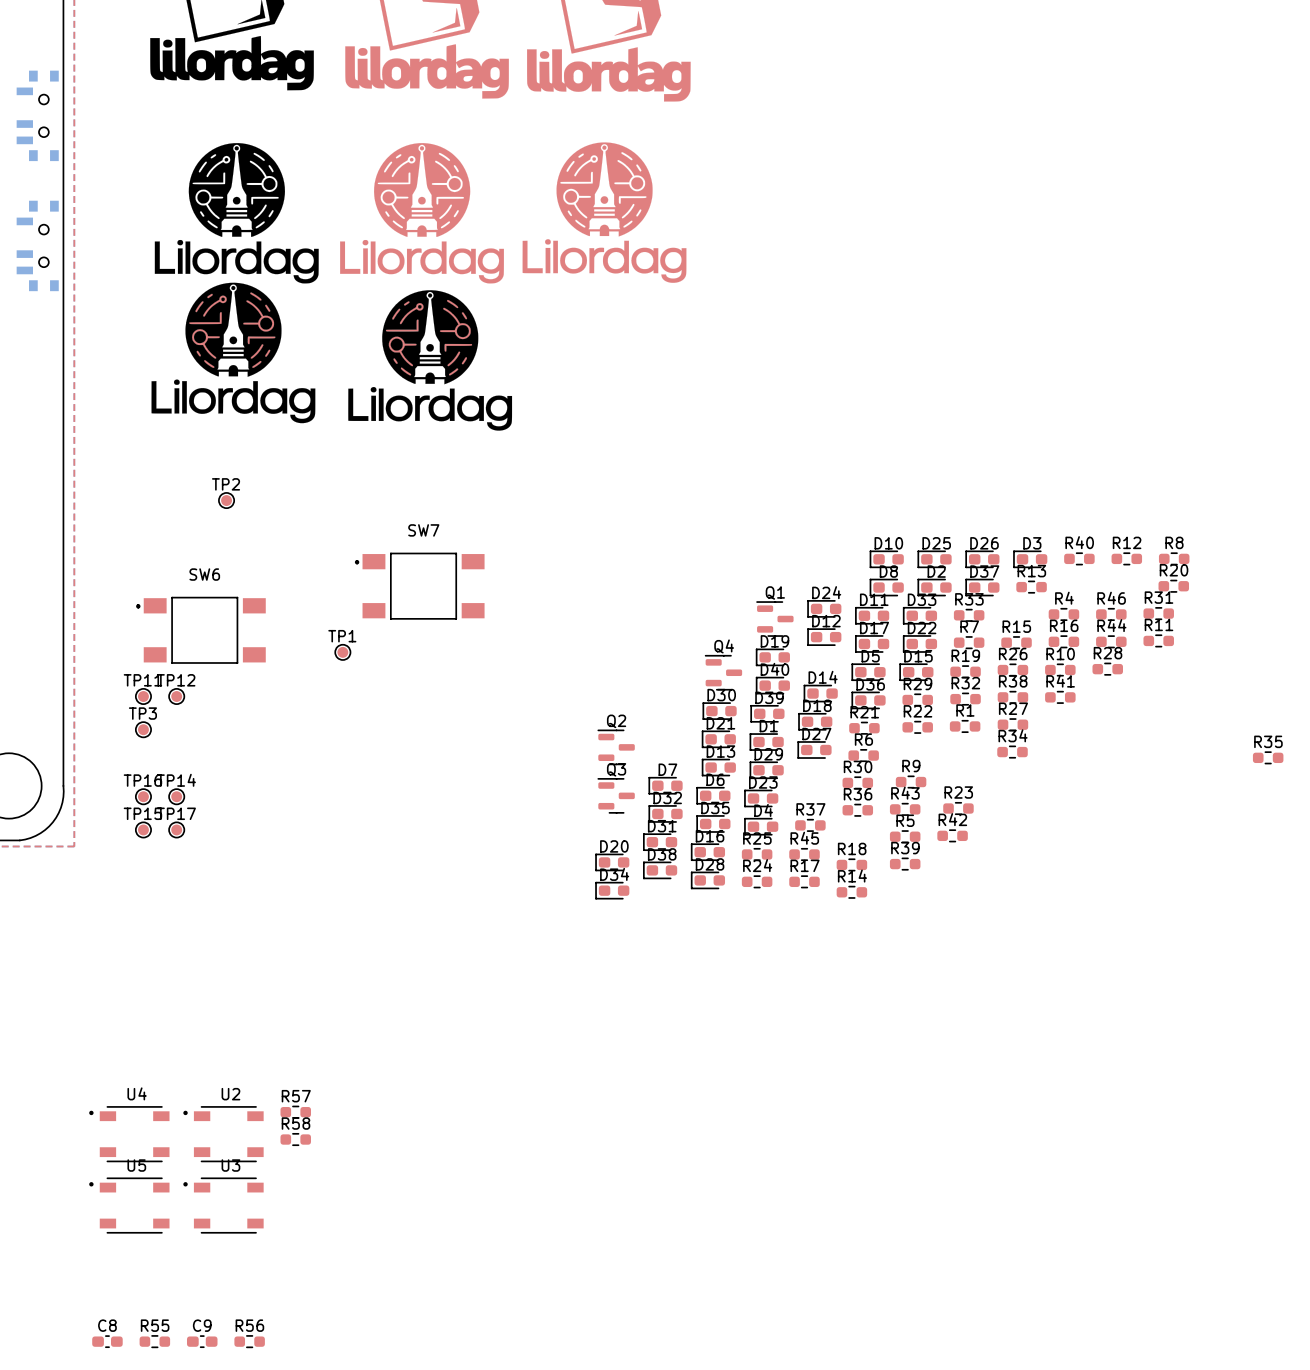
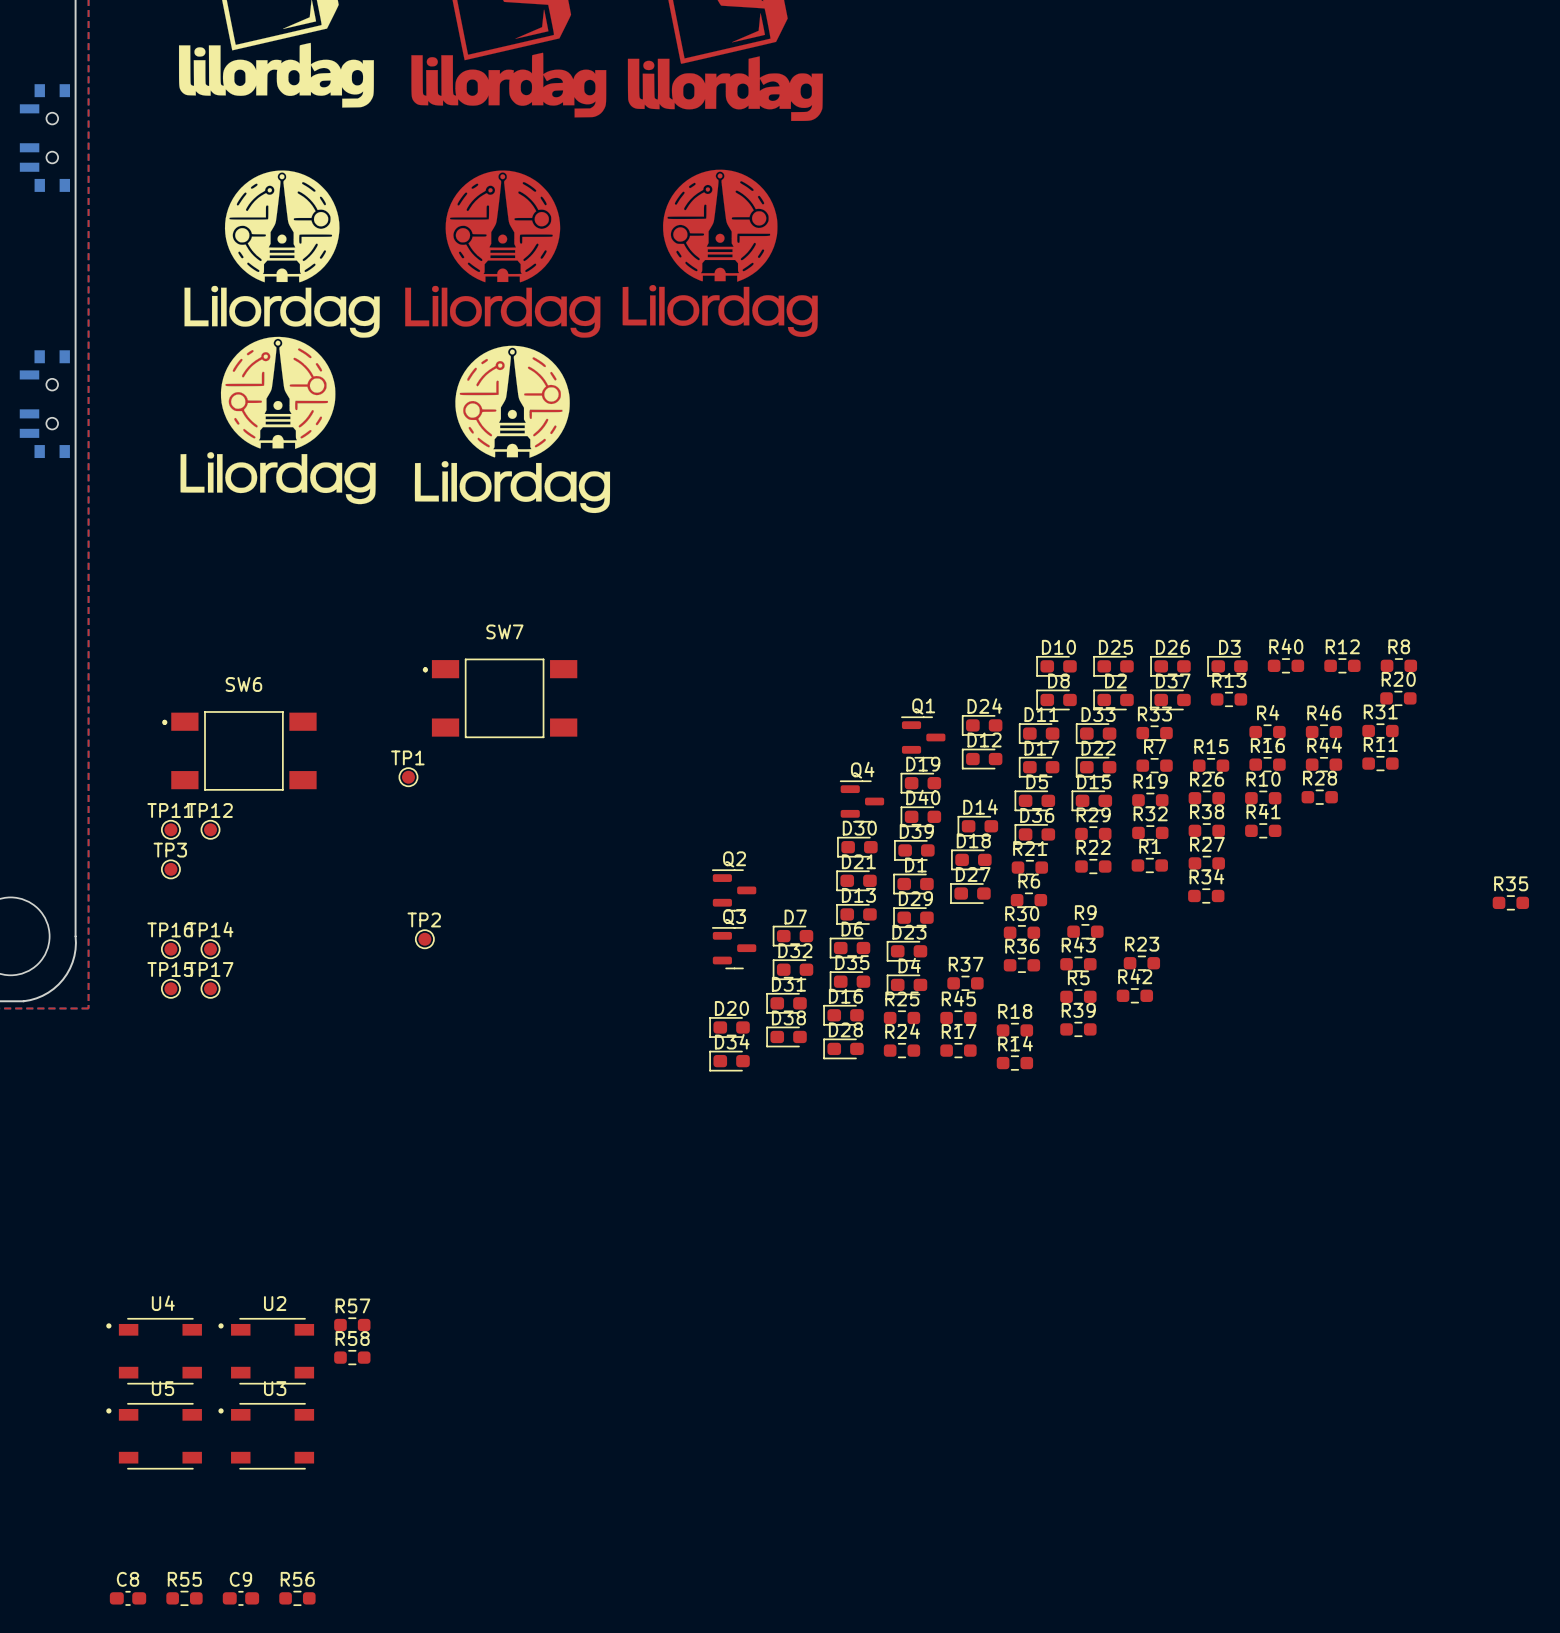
part position: (37, 245) -> (44, 404)
TP2 position: (226, 500) -> (424, 939)

